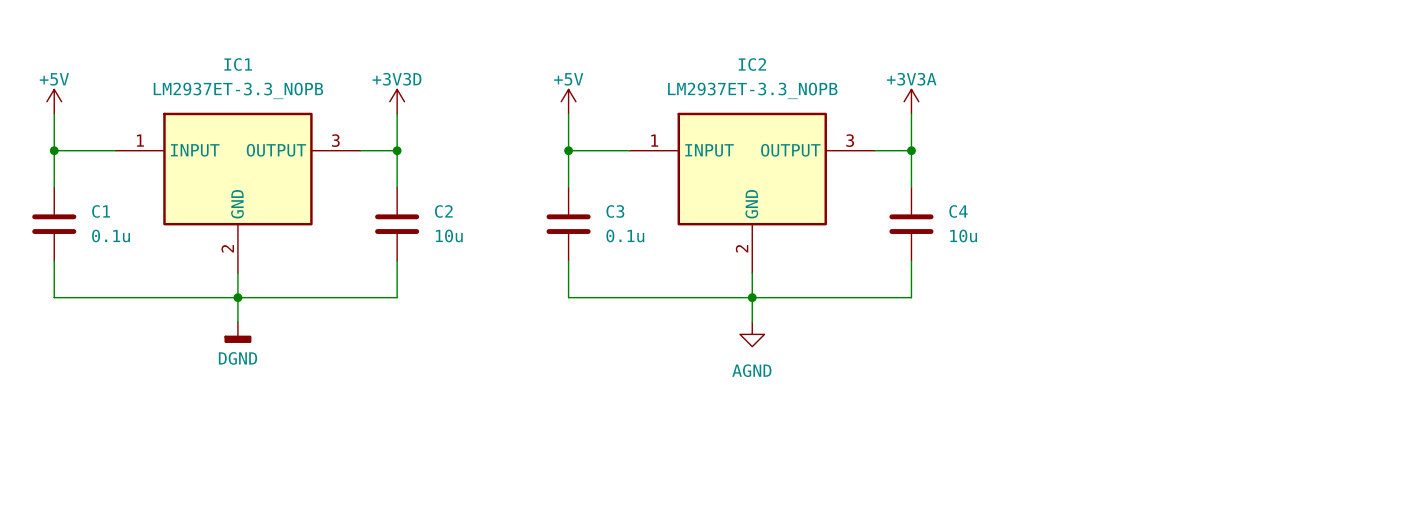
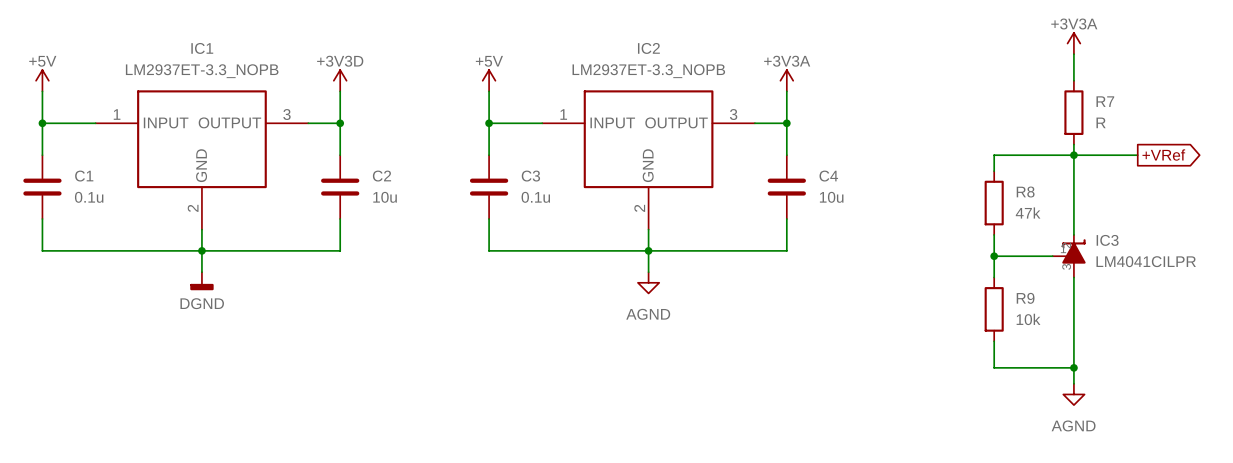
power symbol: none -> +3V3A (1073, 43)
wire: none -> (1073, 54) (1073, 80)
R7: none -> R (1073, 112)
wire: none -> (1073, 144) (1073, 234)
junction: none -> (1073, 155)
wire: none -> (1137, 155) (994, 155) (994, 171)
global label: none -> +VRef (1163, 154)
R8: none -> 47k (994, 203)
wire: none -> (994, 234) (994, 277)
wire: none -> (994, 256) (1052, 256)
junction: none -> (994, 256)
IC3: none -> LM4041CILPR (1069, 256)
wire: none -> (1073, 277) (1073, 383)
R9: none -> 10k (994, 309)
wire: none -> (994, 341) (994, 367) (1073, 367)
junction: none -> (1073, 367)
power symbol: none -> AGND (1073, 394)

